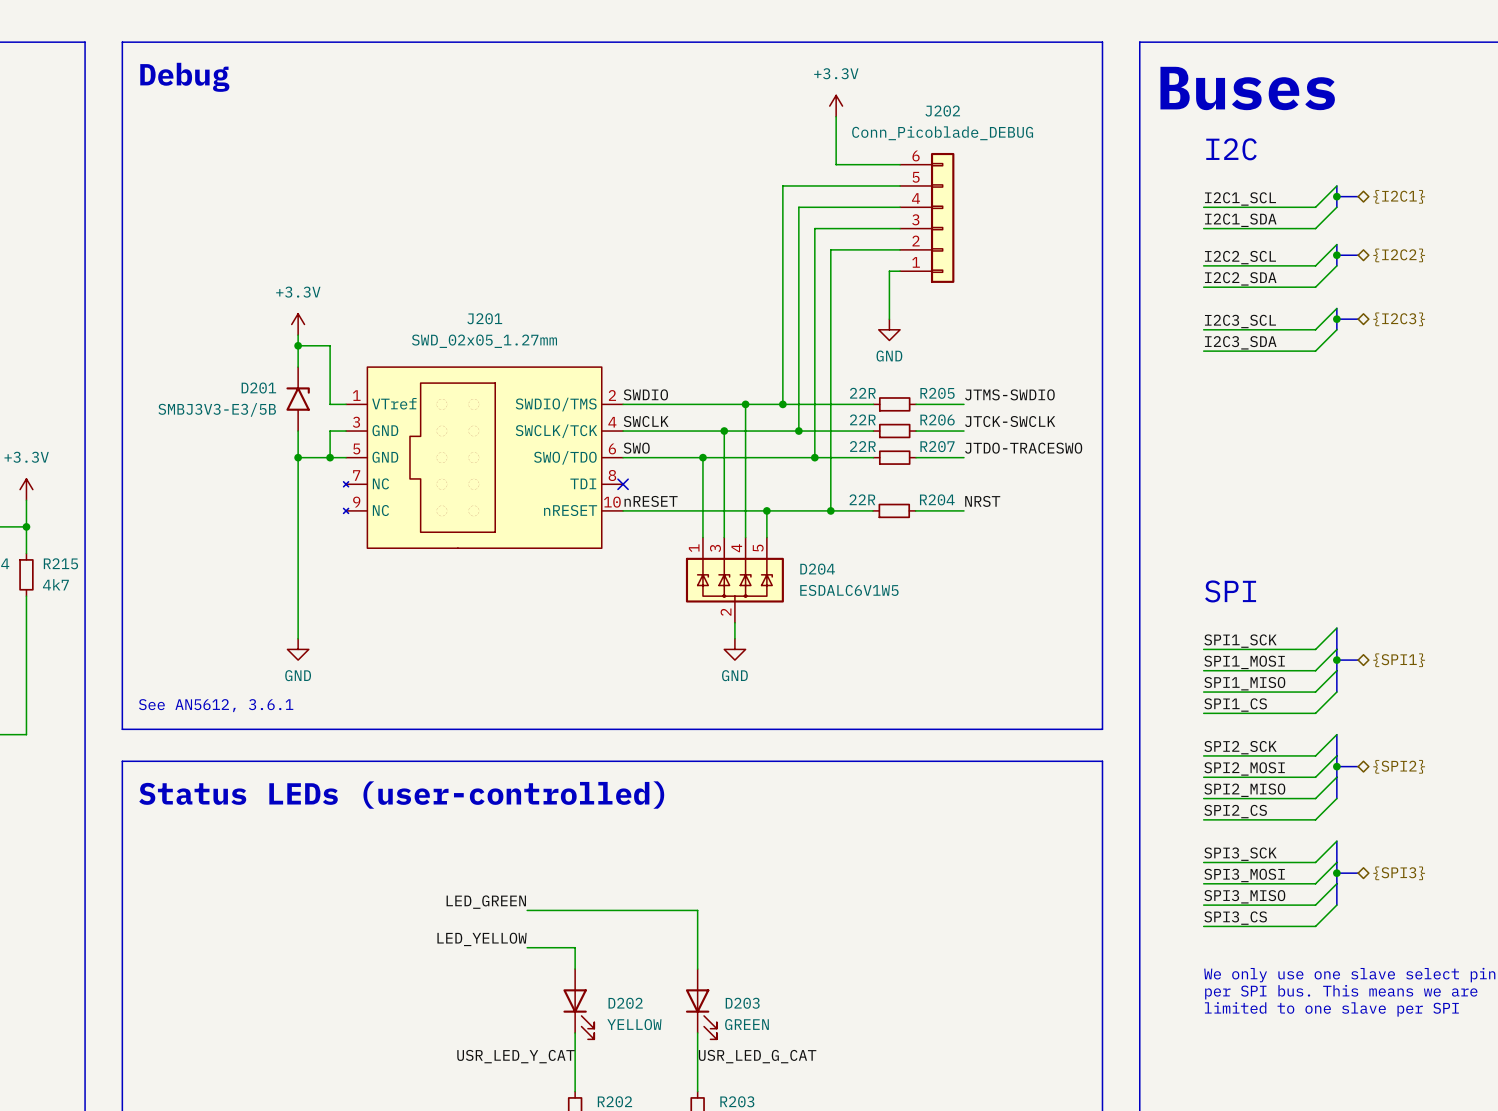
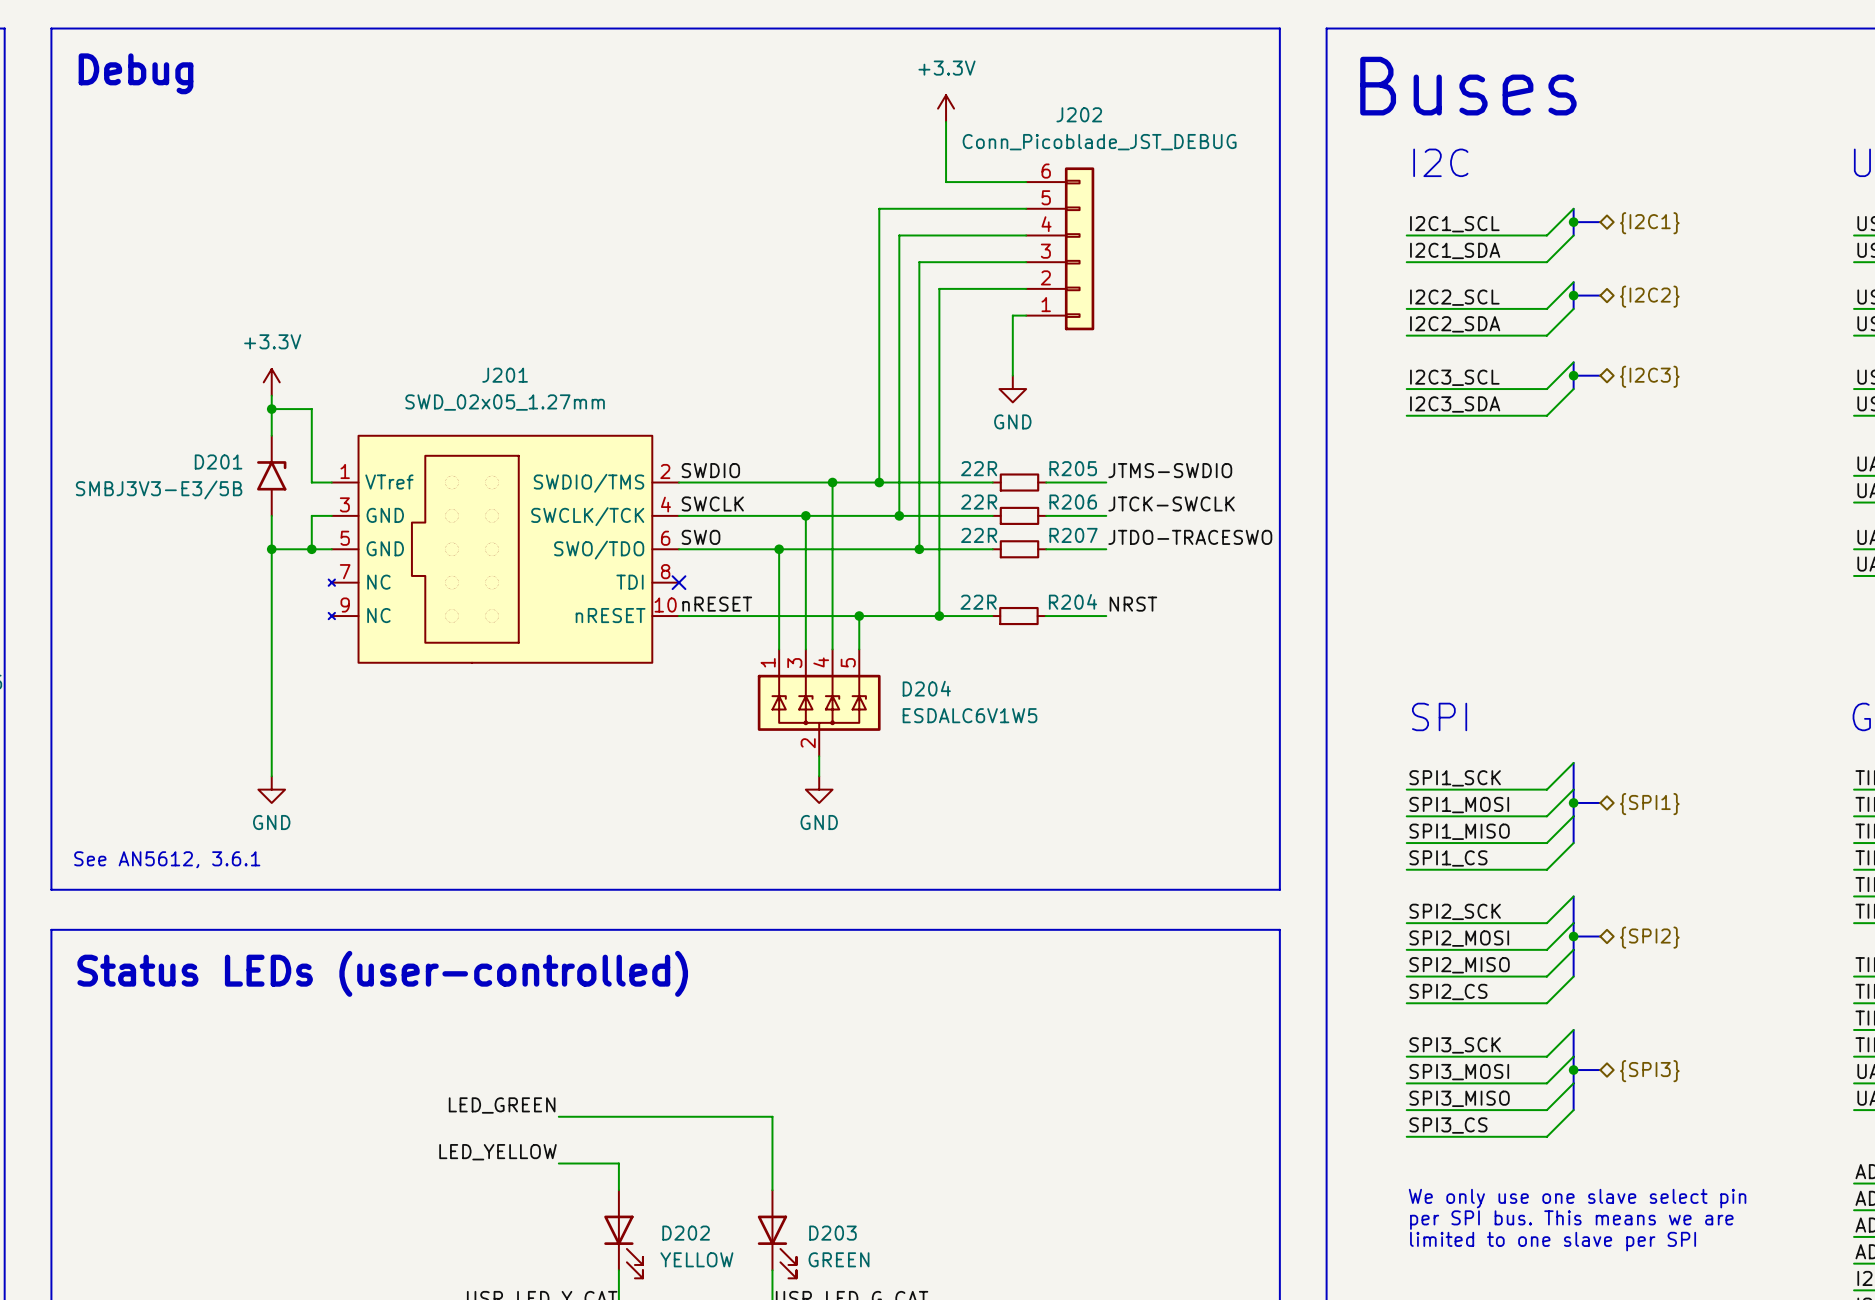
J202 value: Conn_Picoblade_DEBUG (942, 133) -> Conn_Picoblade_JST_DEBUG (1099, 142)

